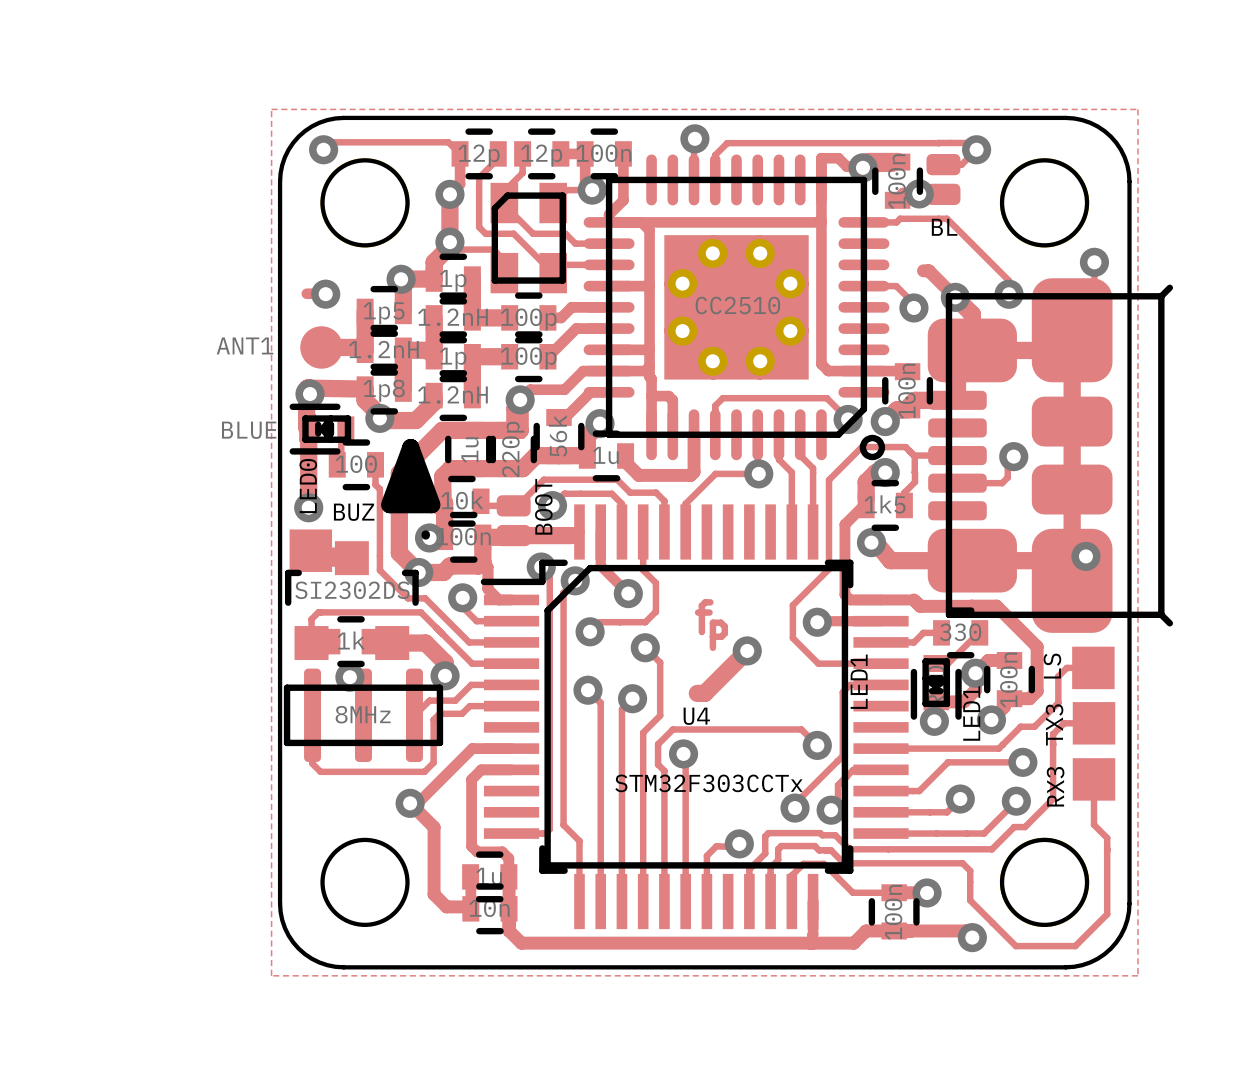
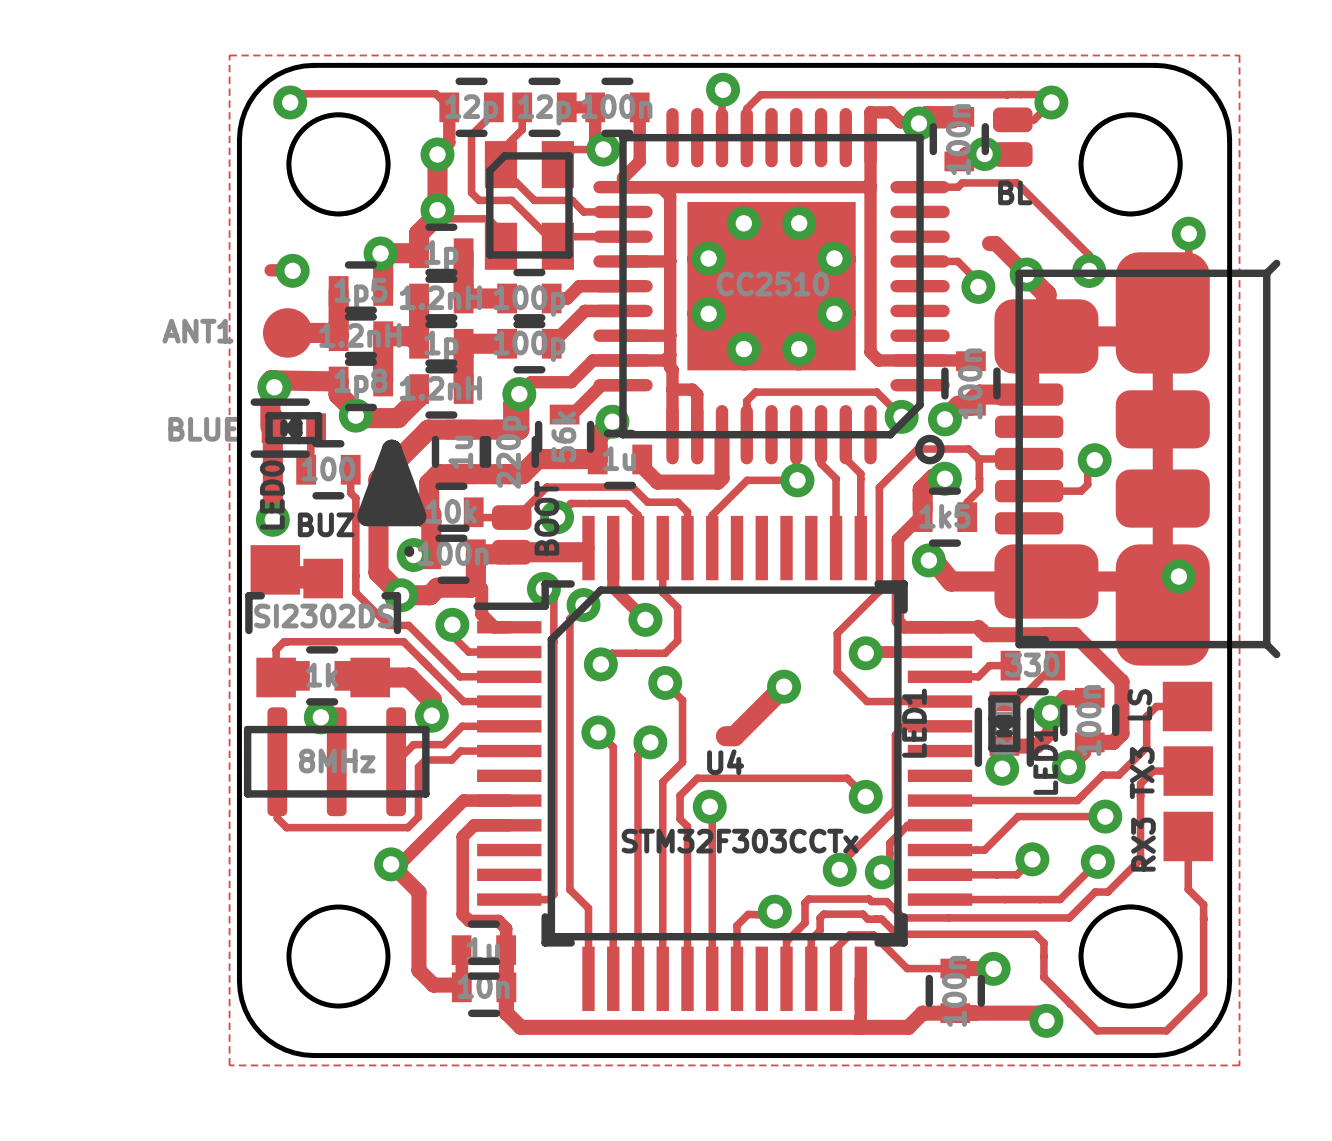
track: (710, 602) (705, 602) (701, 605) (701, 632) -> none
track: (698, 612) (709, 612) -> none
track: (712, 636) (721, 636) (724, 633) (724, 626) (721, 622) (712, 622) (712, 647) -> none

